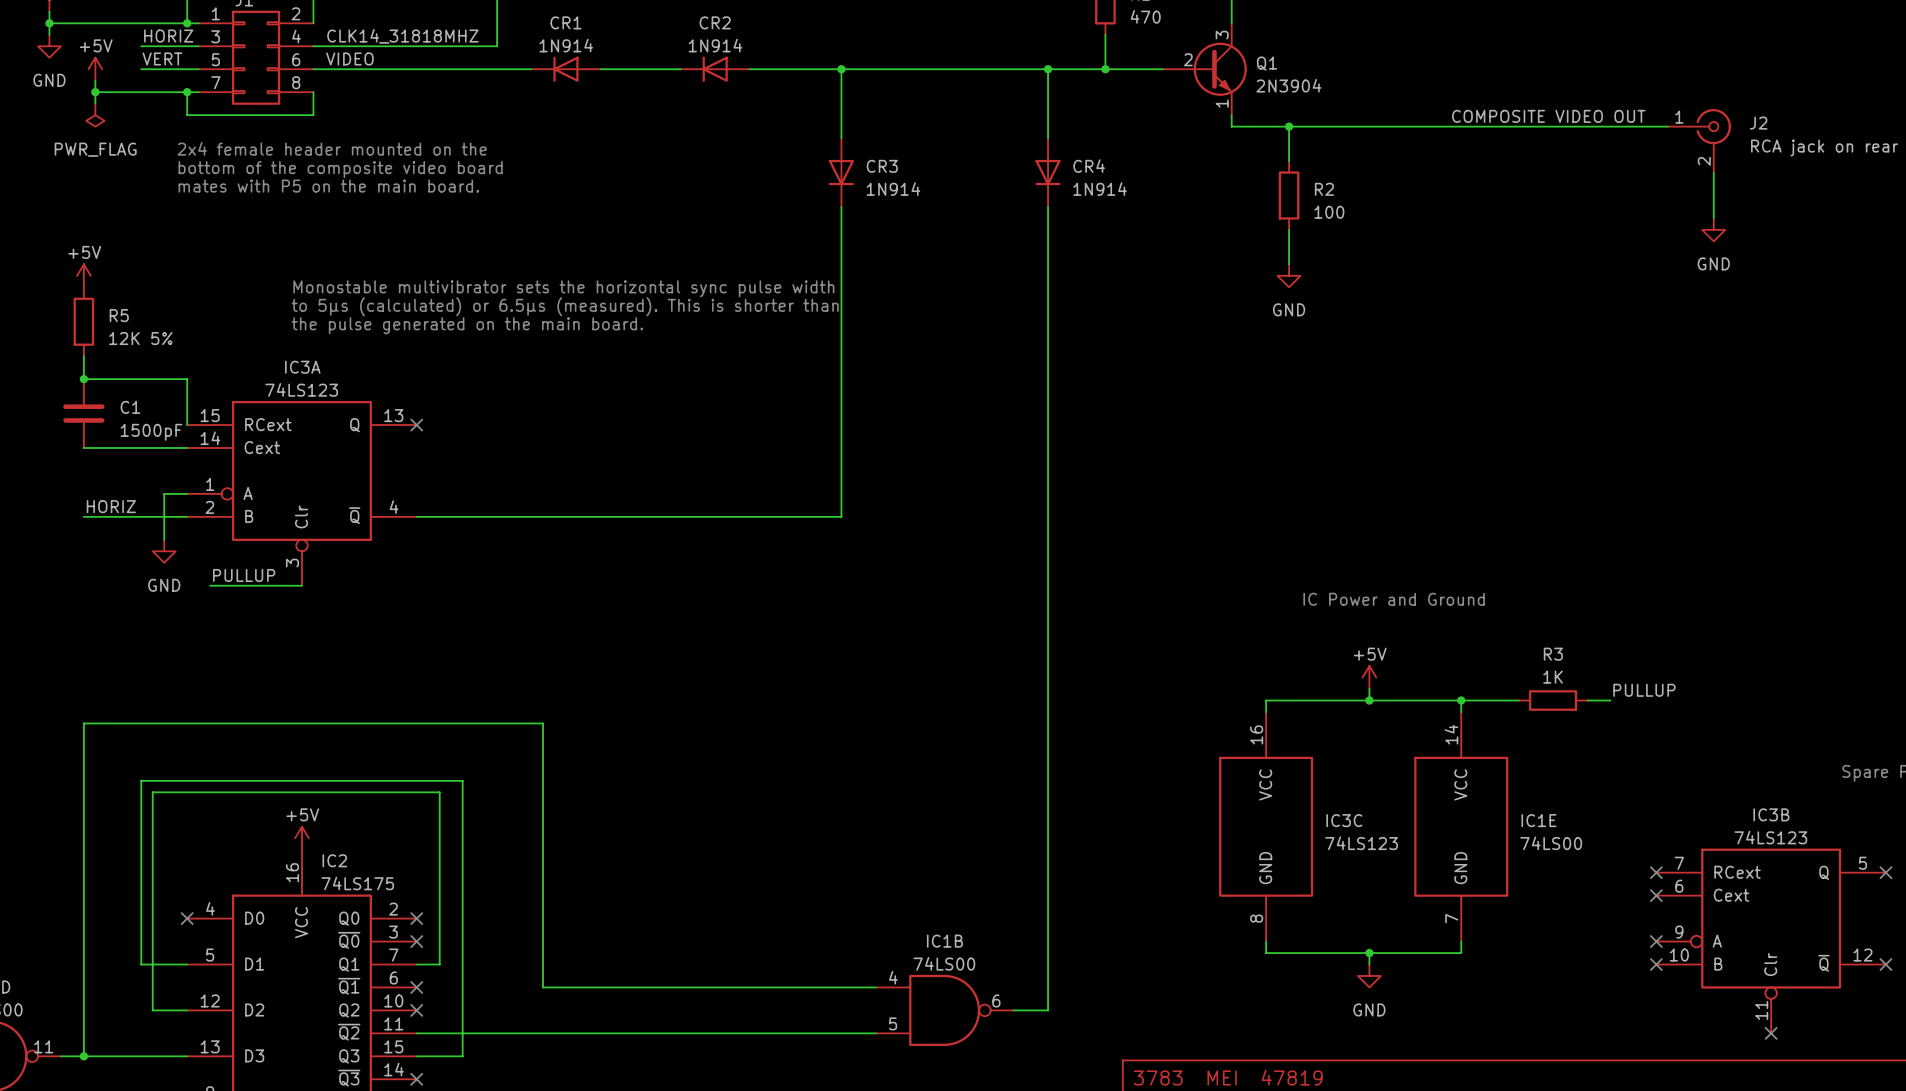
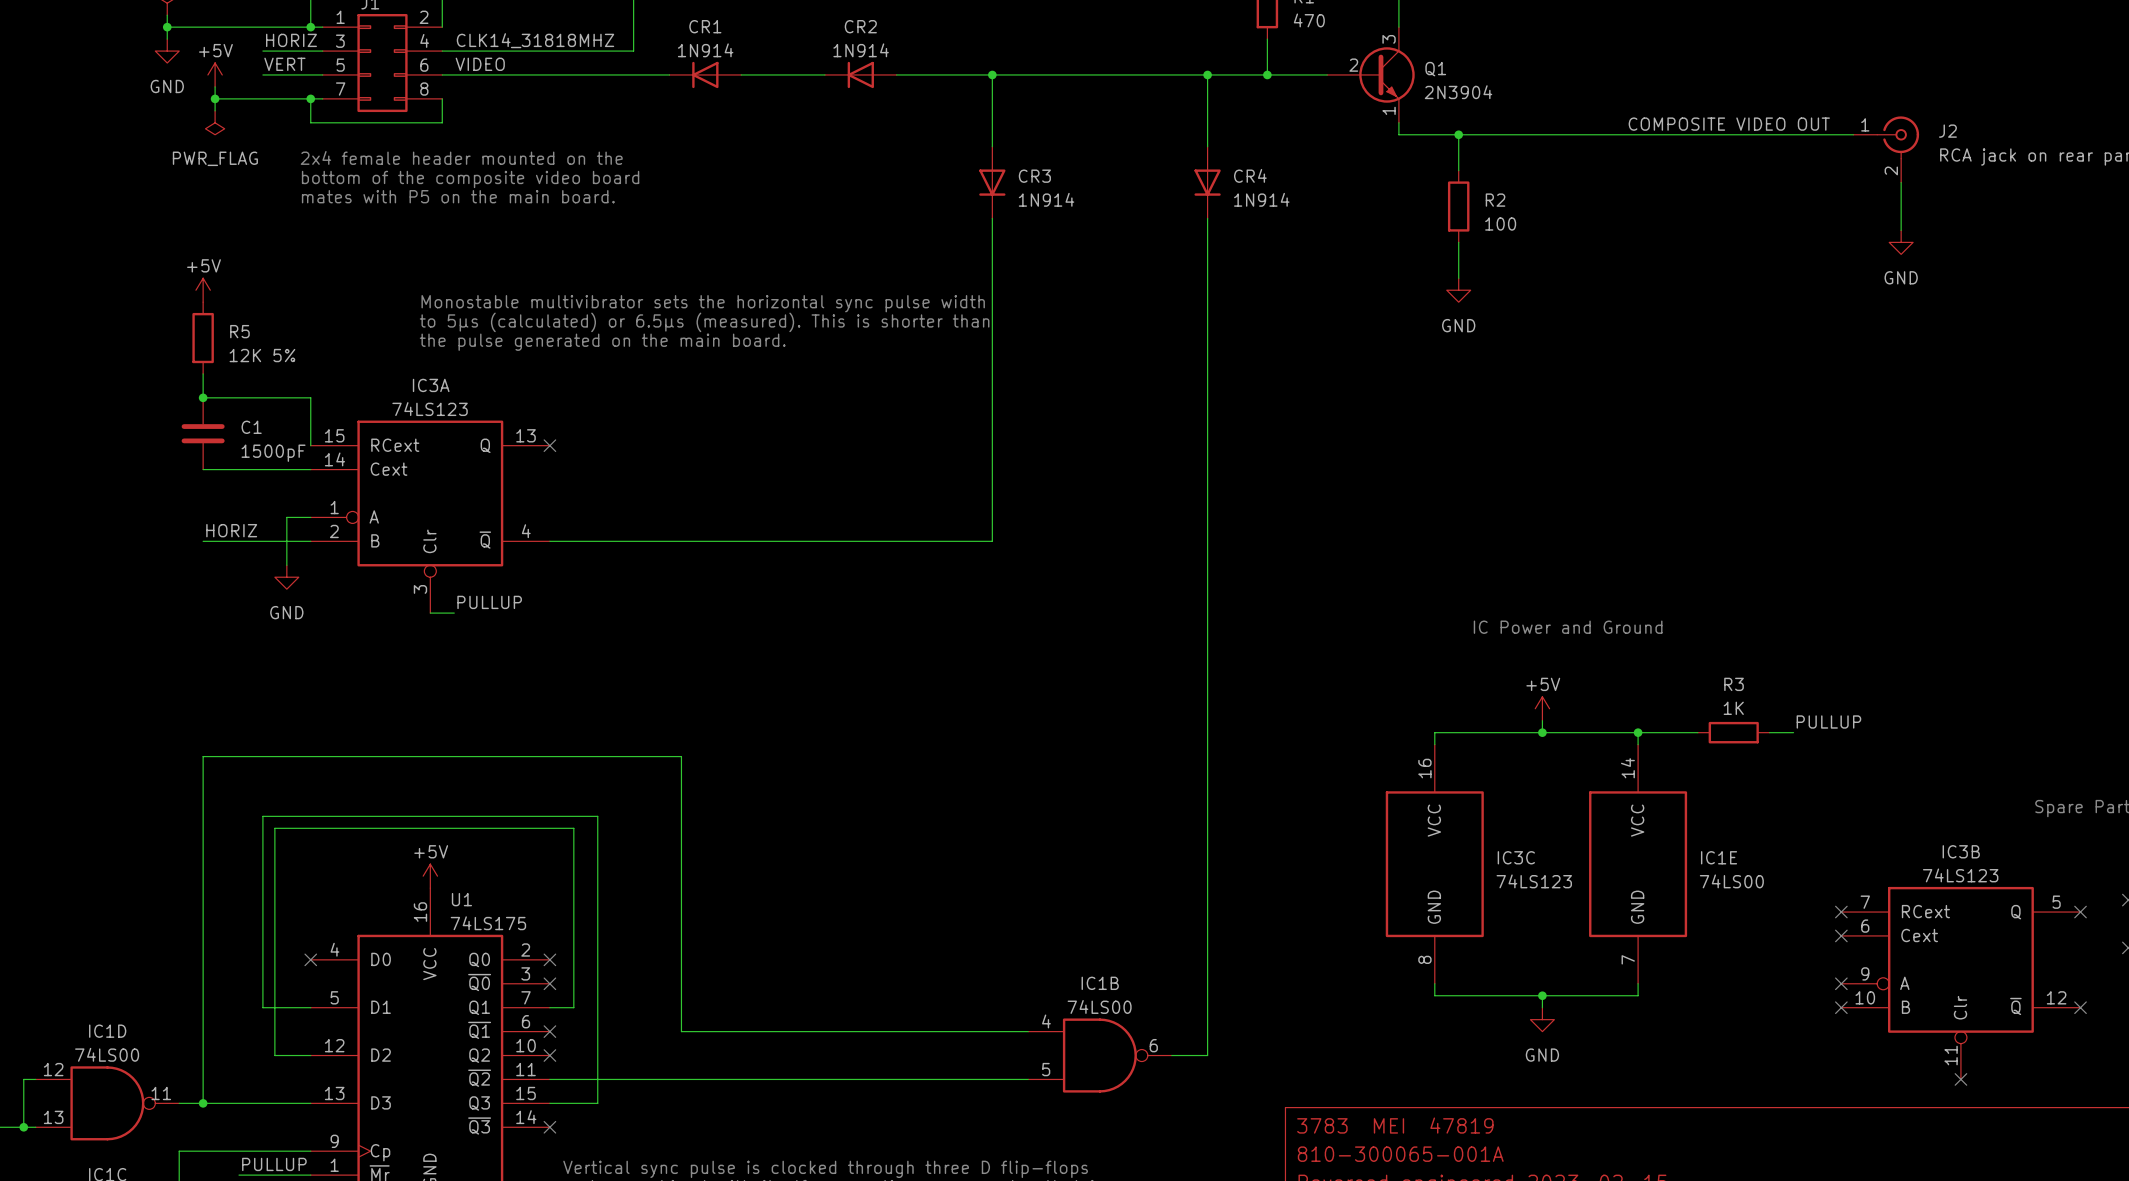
label position: PULLUP (244, 575) -> PULLUP (489, 602)
wire: (210, 585) (301, 585) -> (454, 613) (430, 613)
IC2 name: IC2 (334, 860) -> U1 (461, 899)

